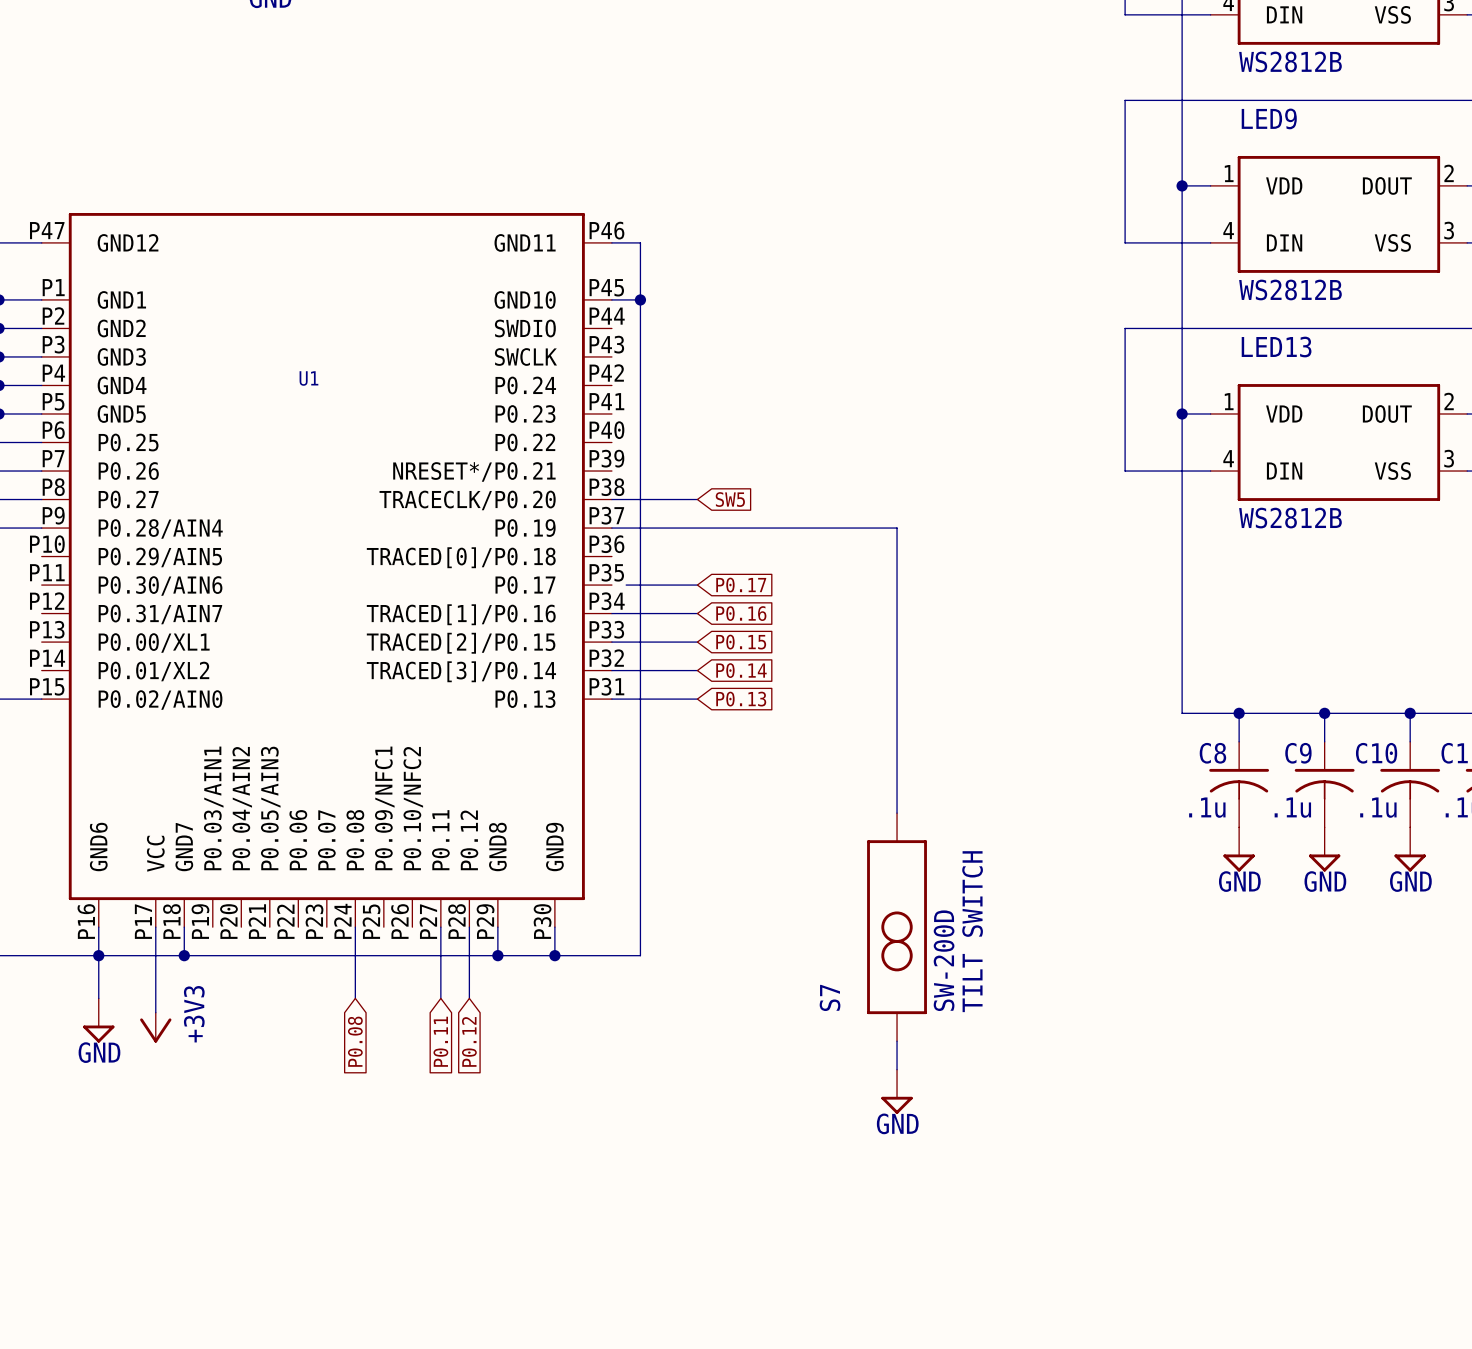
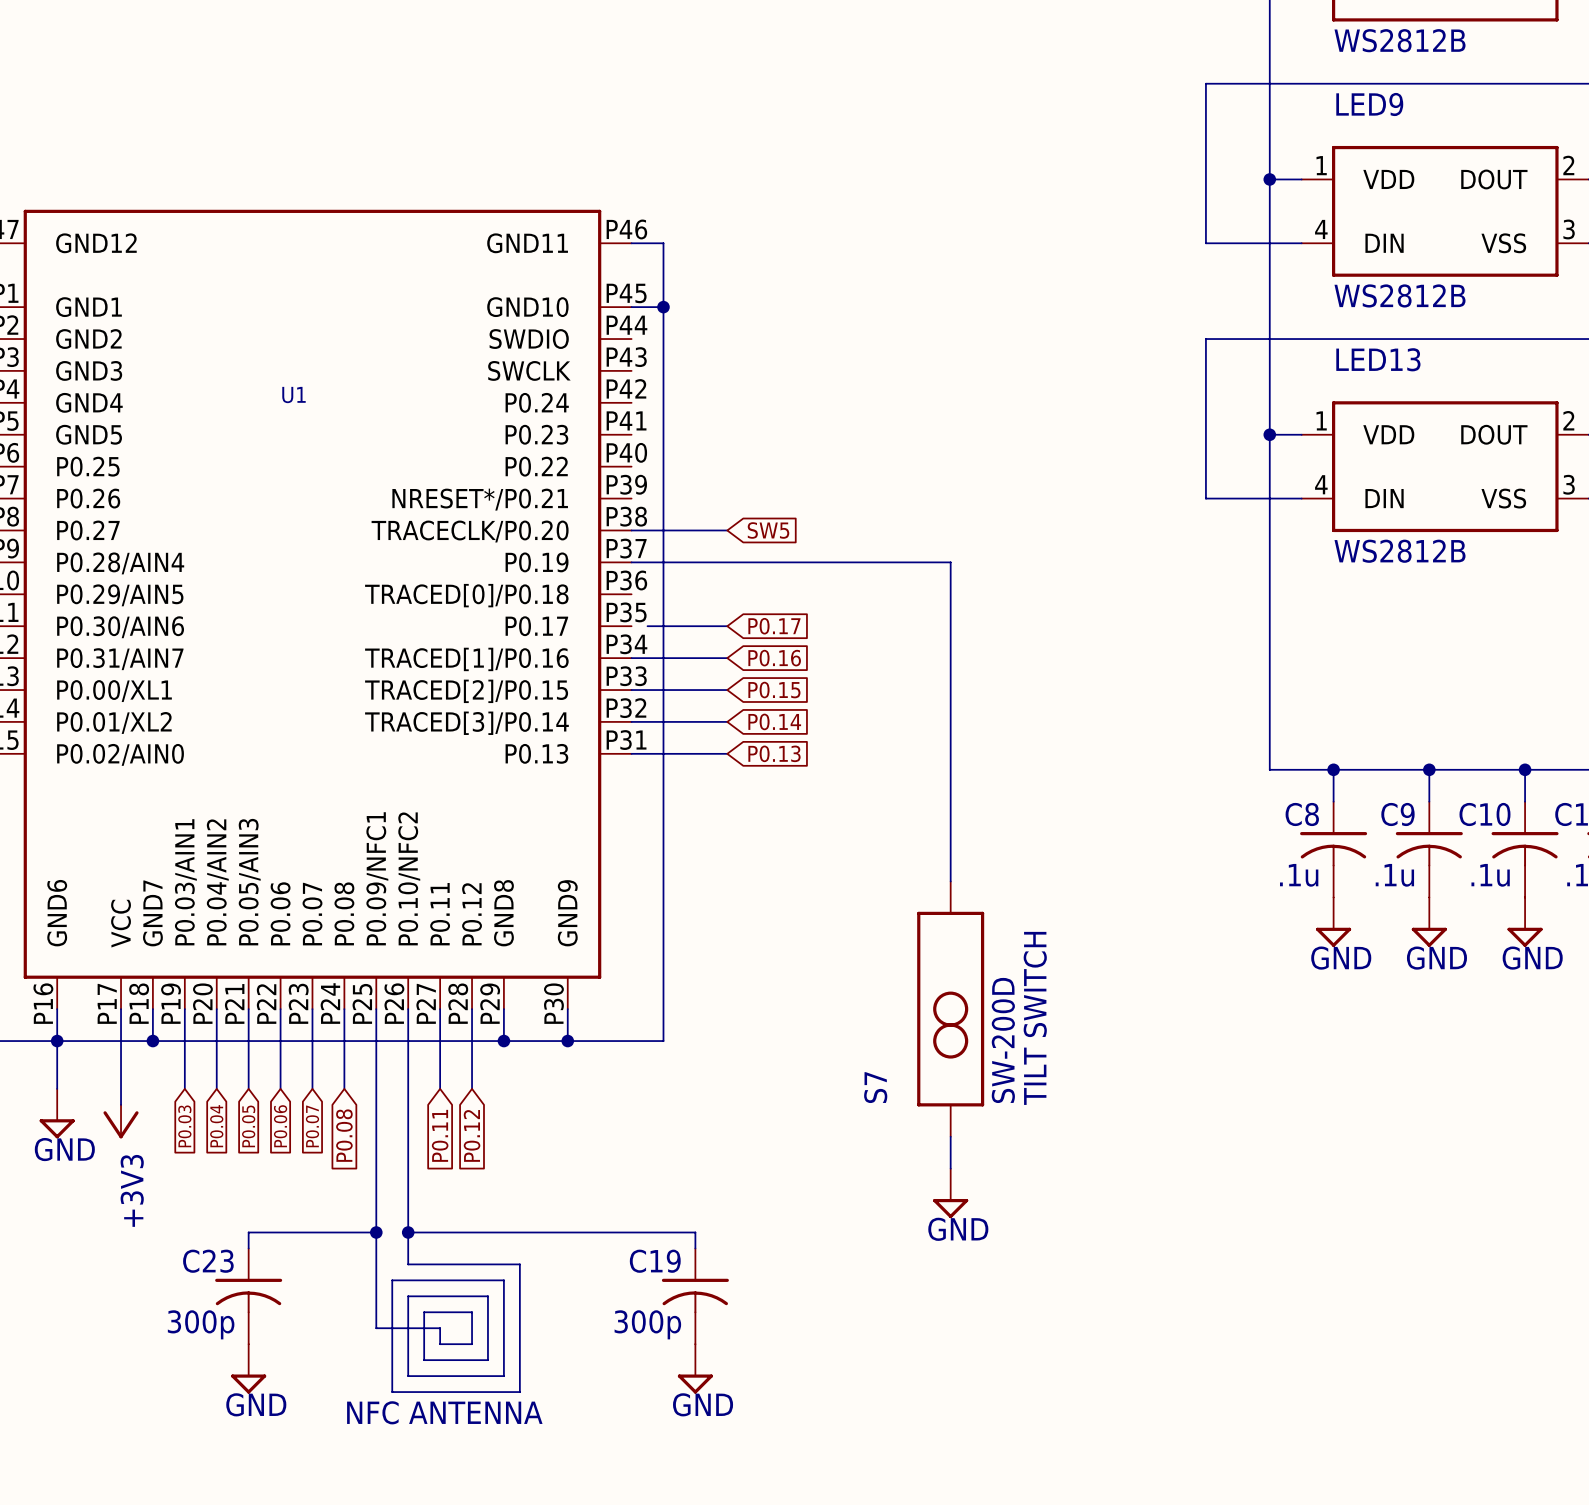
wire: none -> (184, 1009) (184, 1088)
wire: none -> (216, 1009) (216, 1088)
wire: none -> (248, 1009) (248, 1088)
wire: none -> (280, 1009) (280, 1088)
wire: none -> (312, 1009) (312, 1088)
wire: none -> (376, 1009) (376, 1328) (440, 1328) (440, 1344) (472, 1344) (472, 1312) (424, 1312) (424, 1360) (487, 1360) (487, 1296) (408, 1296) (408, 1376) (503, 1376) (503, 1280) (392, 1280) (392, 1392) (519, 1392) (519, 1264) (408, 1264) (408, 1009)
power symbol text position: +3V3 (194, 1014) -> +3V3 (132, 1190)
global label: none -> P0.04 (216, 1126)
global label: none -> P0.03 (184, 1126)
global label: none -> P0.05 (248, 1126)
global label: none -> P0.06 (280, 1126)
global label: none -> P0.07 (312, 1126)
wire: none -> (376, 1232) (248, 1232) (248, 1248)
junction: none -> (376, 1232)
wire: none -> (408, 1232) (695, 1232) (695, 1248)
junction: none -> (408, 1232)
C23: none -> 300p (248, 1296)
C19: none -> 300p (695, 1296)
power symbol: none -> GND (248, 1368)
power symbol: none -> GND (695, 1368)
text: none -> NFC ANTENNA (444, 1412)

